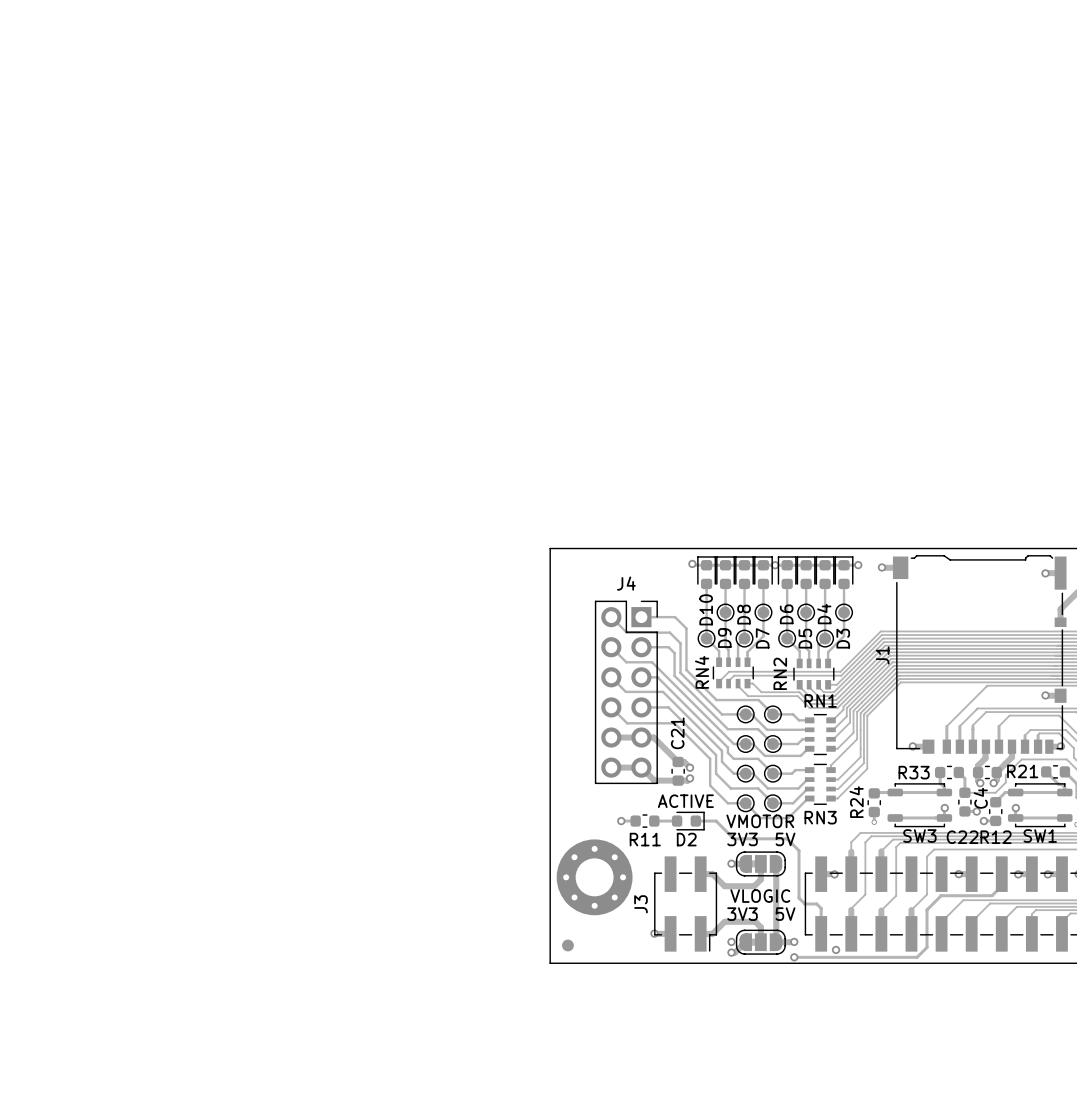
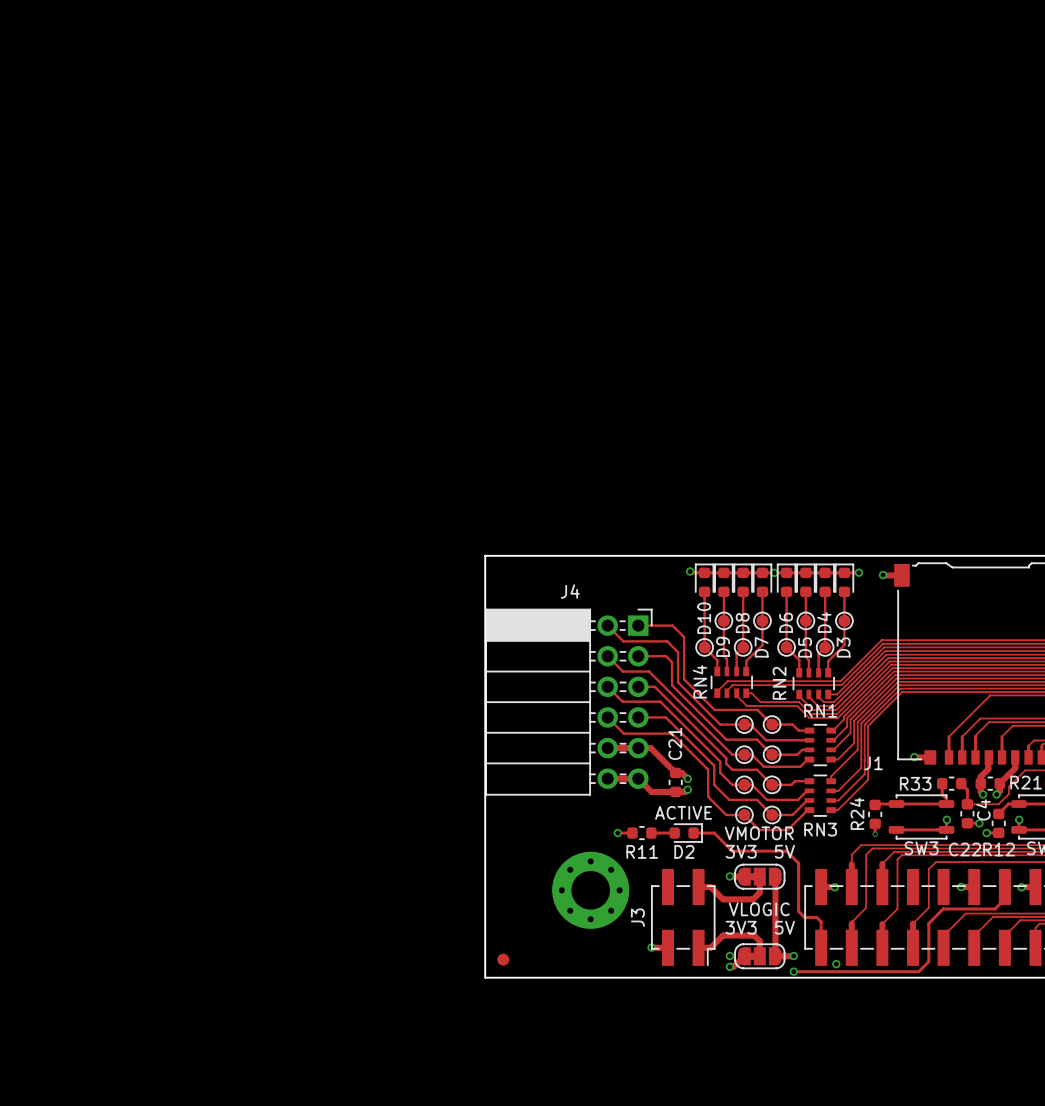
board edge: (550, 548) (550, 963) -> (545, 555) (485, 555) (485, 977) (545, 977)
J4 footprint: [594, 600, 658, 785] -> [485, 608, 653, 796]
J1 name rotation: 0° (882, 655) -> 90° clockwise (873, 763)
J1 name position: J1 (882, 655) -> J1 (873, 763)
part position: (567, 945) -> (503, 959)

